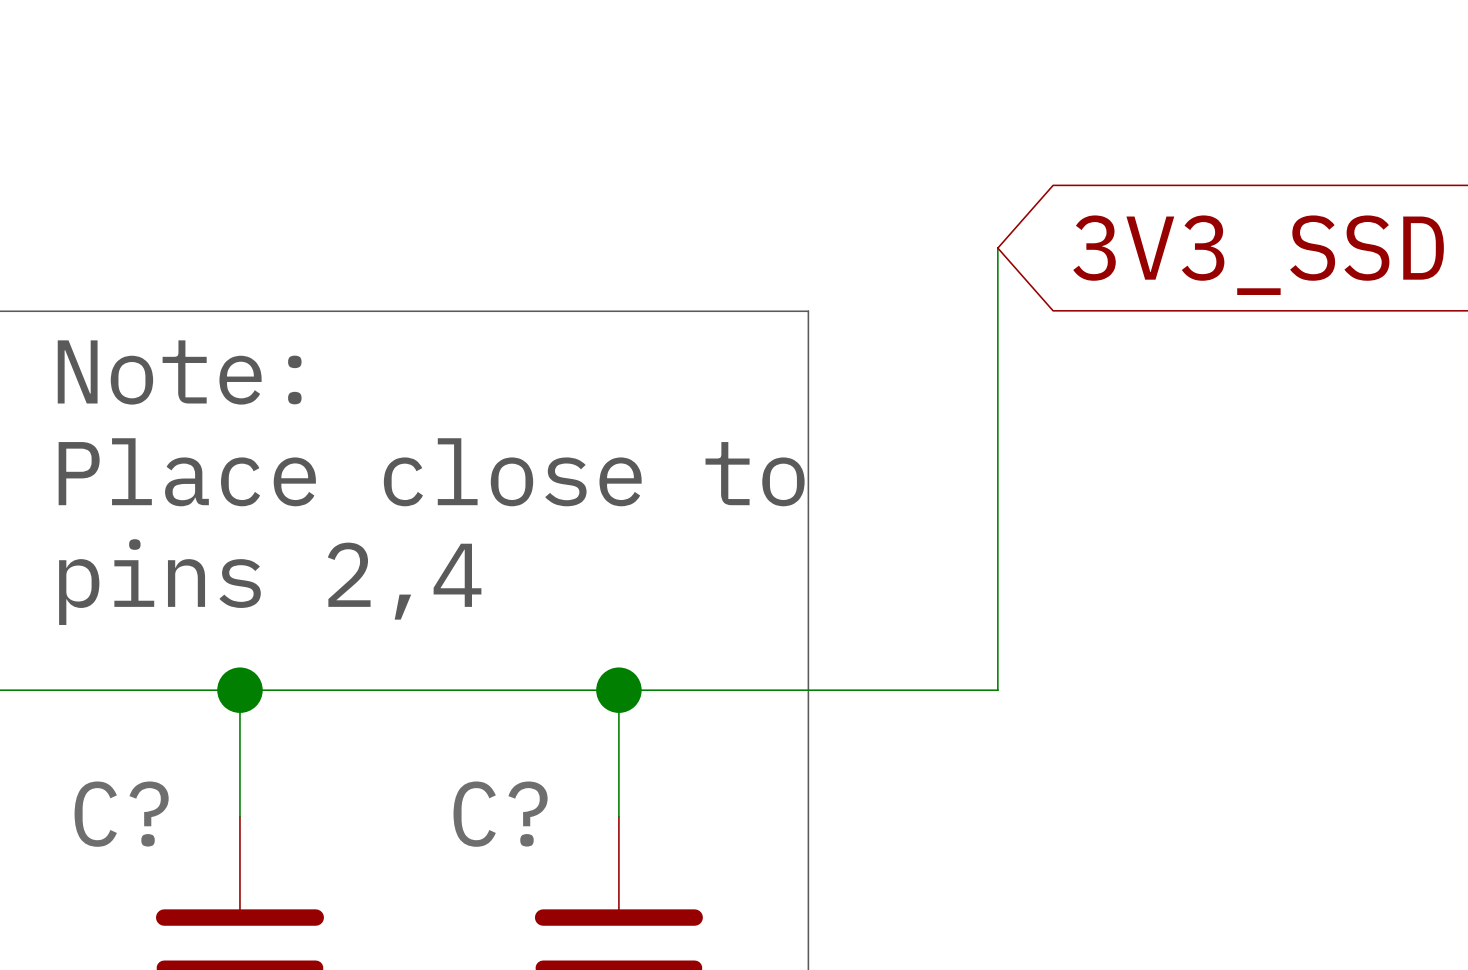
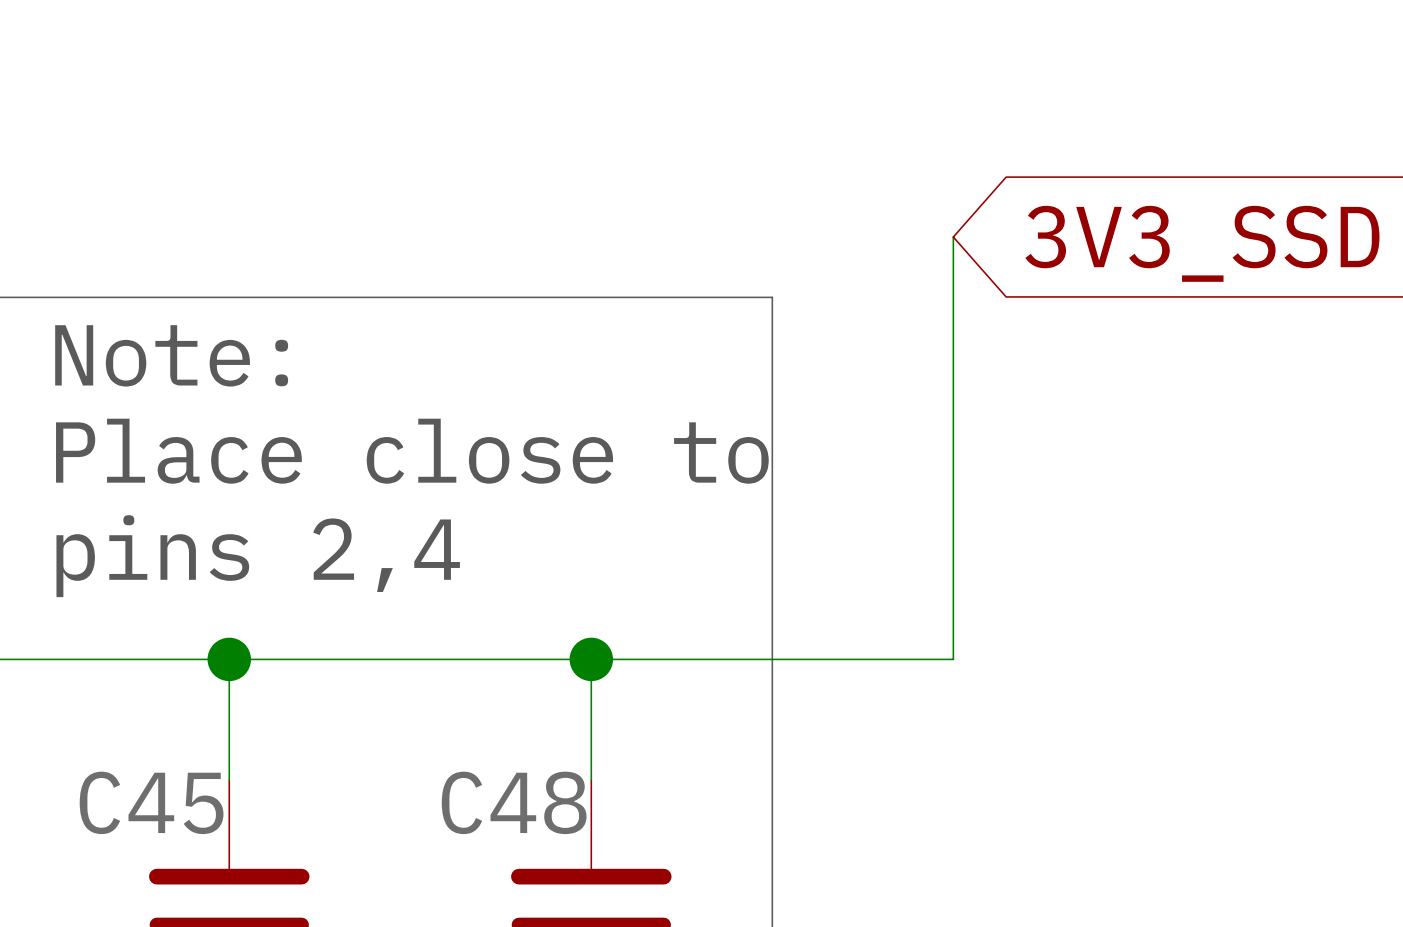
C? name: C? (121, 814) -> C45 (151, 802)
C? name: C? (500, 814) -> C48 (514, 802)

